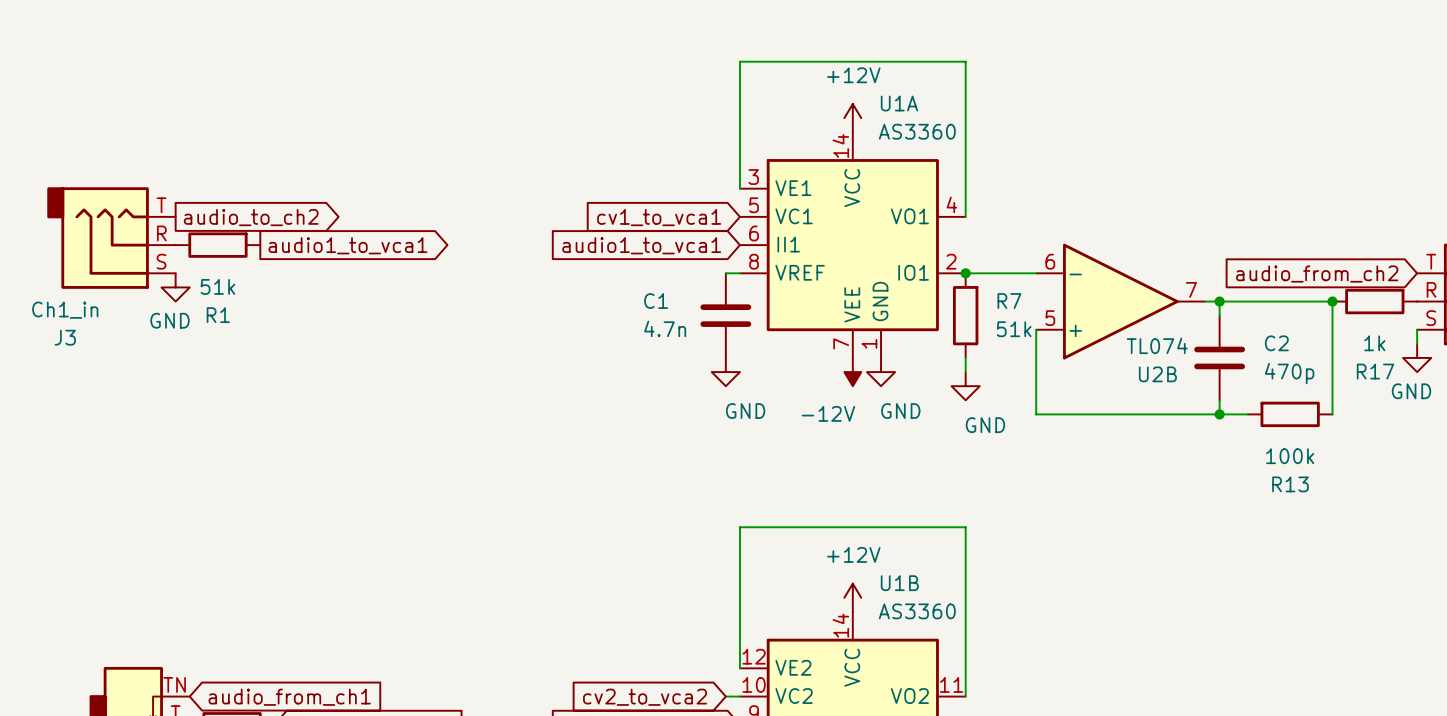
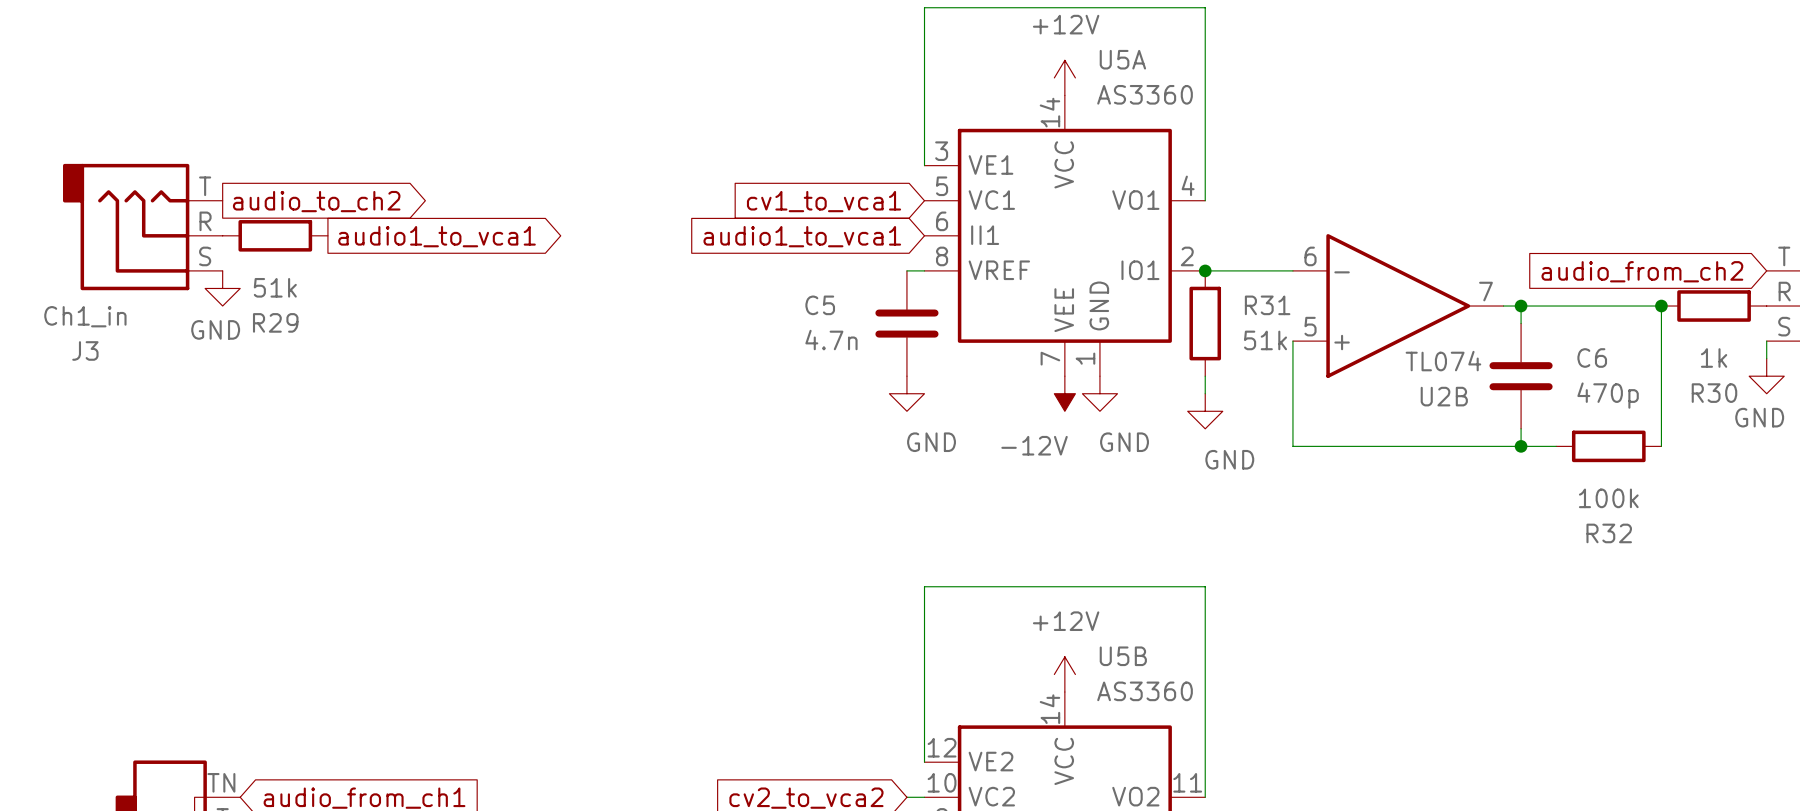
U1A name: U1A (899, 103) -> U5A (1122, 59)
C1 name: C1 (656, 301) -> C5 (820, 305)
R7 name: R7 (1009, 301) -> R31 (1267, 305)
R1 name: R1 (218, 315) -> R29 (275, 322)
C2 name: C2 (1276, 343) -> C6 (1592, 357)
R17 name: R17 (1375, 371) -> R30 (1714, 393)
R13 name: R13 (1290, 484) -> R32 (1609, 533)
U1B name: U1B (899, 583) -> U5B (1123, 656)

